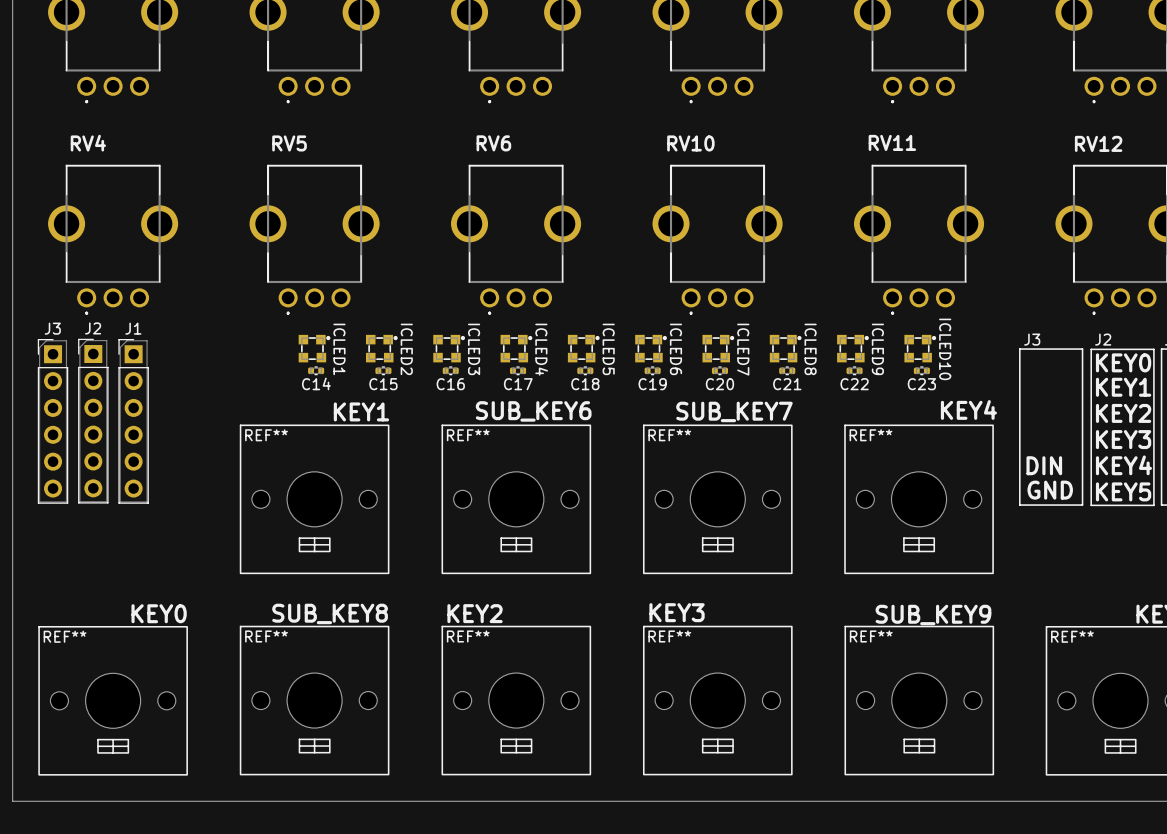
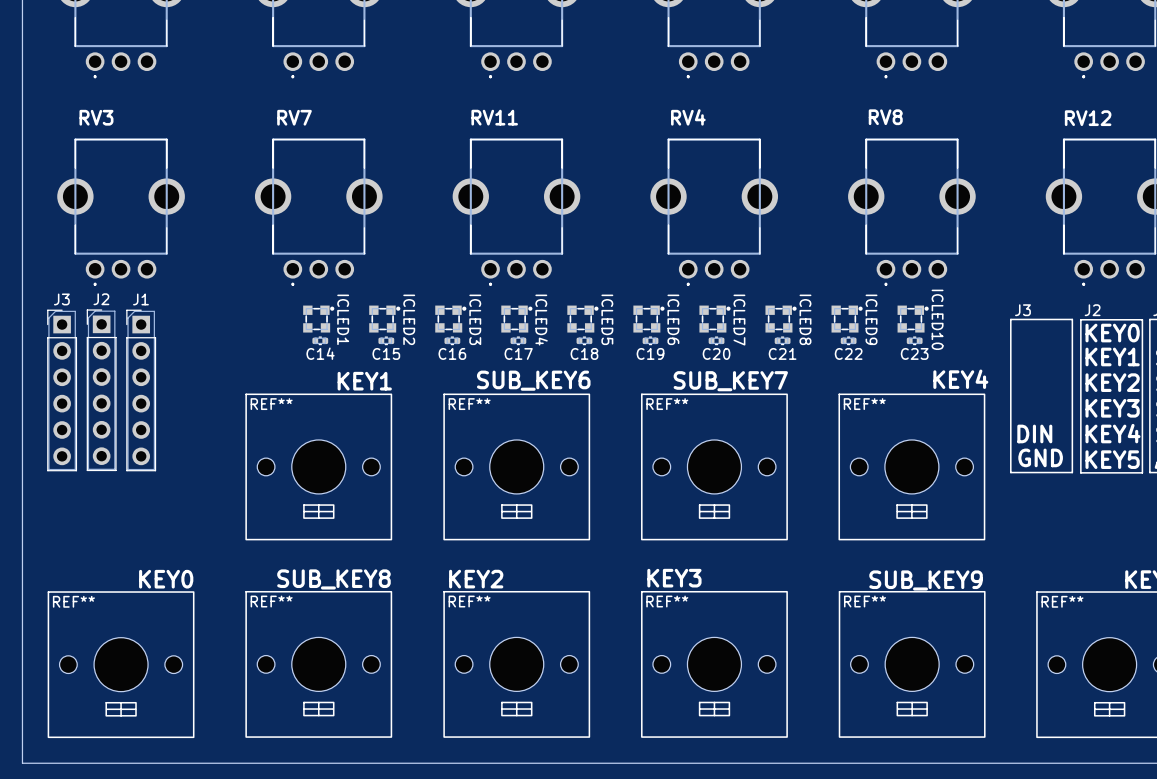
RV11 name: RV11 (892, 142) -> RV8 (885, 117)
RV4 name: RV4 (88, 143) -> RV3 (96, 117)
RV5 name: RV5 (289, 143) -> RV7 (294, 117)
RV6 name: RV6 (493, 143) -> RV11 (494, 117)
RV10 name: RV10 (690, 143) -> RV4 (688, 117)

